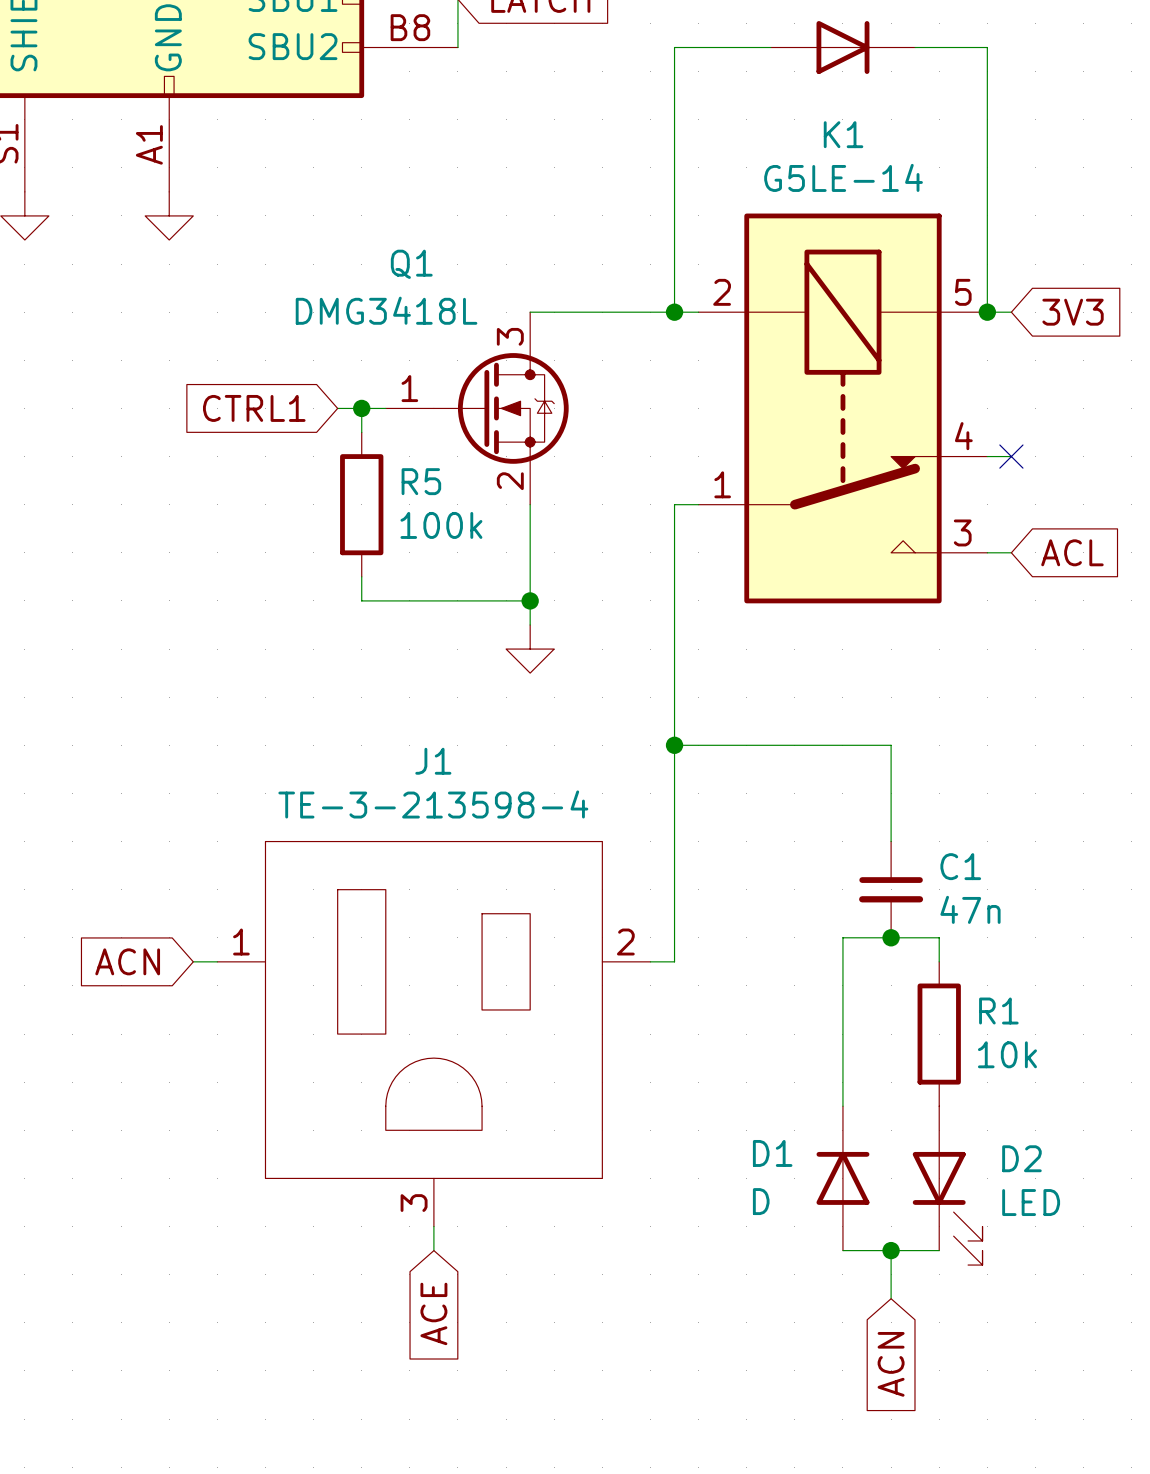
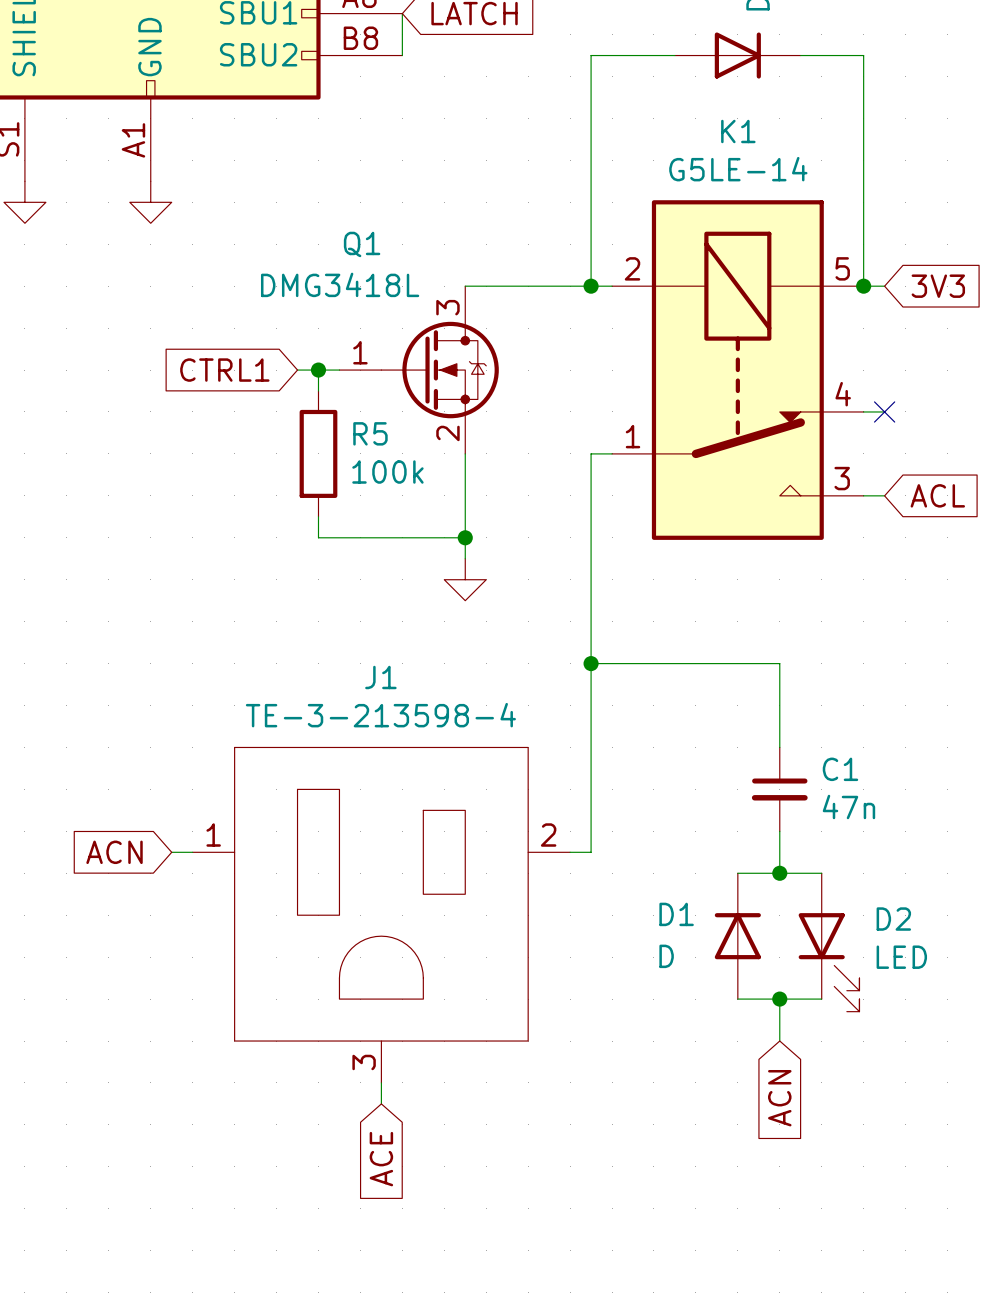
wire: none -> (779, 831) (779, 873)
junction position: (891, 937) -> (779, 873)
wire: (939, 961) (939, 937) (842, 937) (842, 1106) -> none
wire: none -> (737, 873) (821, 873)
R1: 10k (939, 1034) -> none
junction: none -> (779, 999)
D1 position: (842, 1178) -> (737, 936)
D2 position: (947, 1185) -> (829, 942)
wire: (842, 1250) (939, 1250) -> (737, 999) (821, 999)
wire: (891, 1250) (891, 1298) -> (779, 999) (779, 1041)
junction: (891, 1250) -> none
global label position: ACN (891, 1364) -> ACN (779, 1098)

